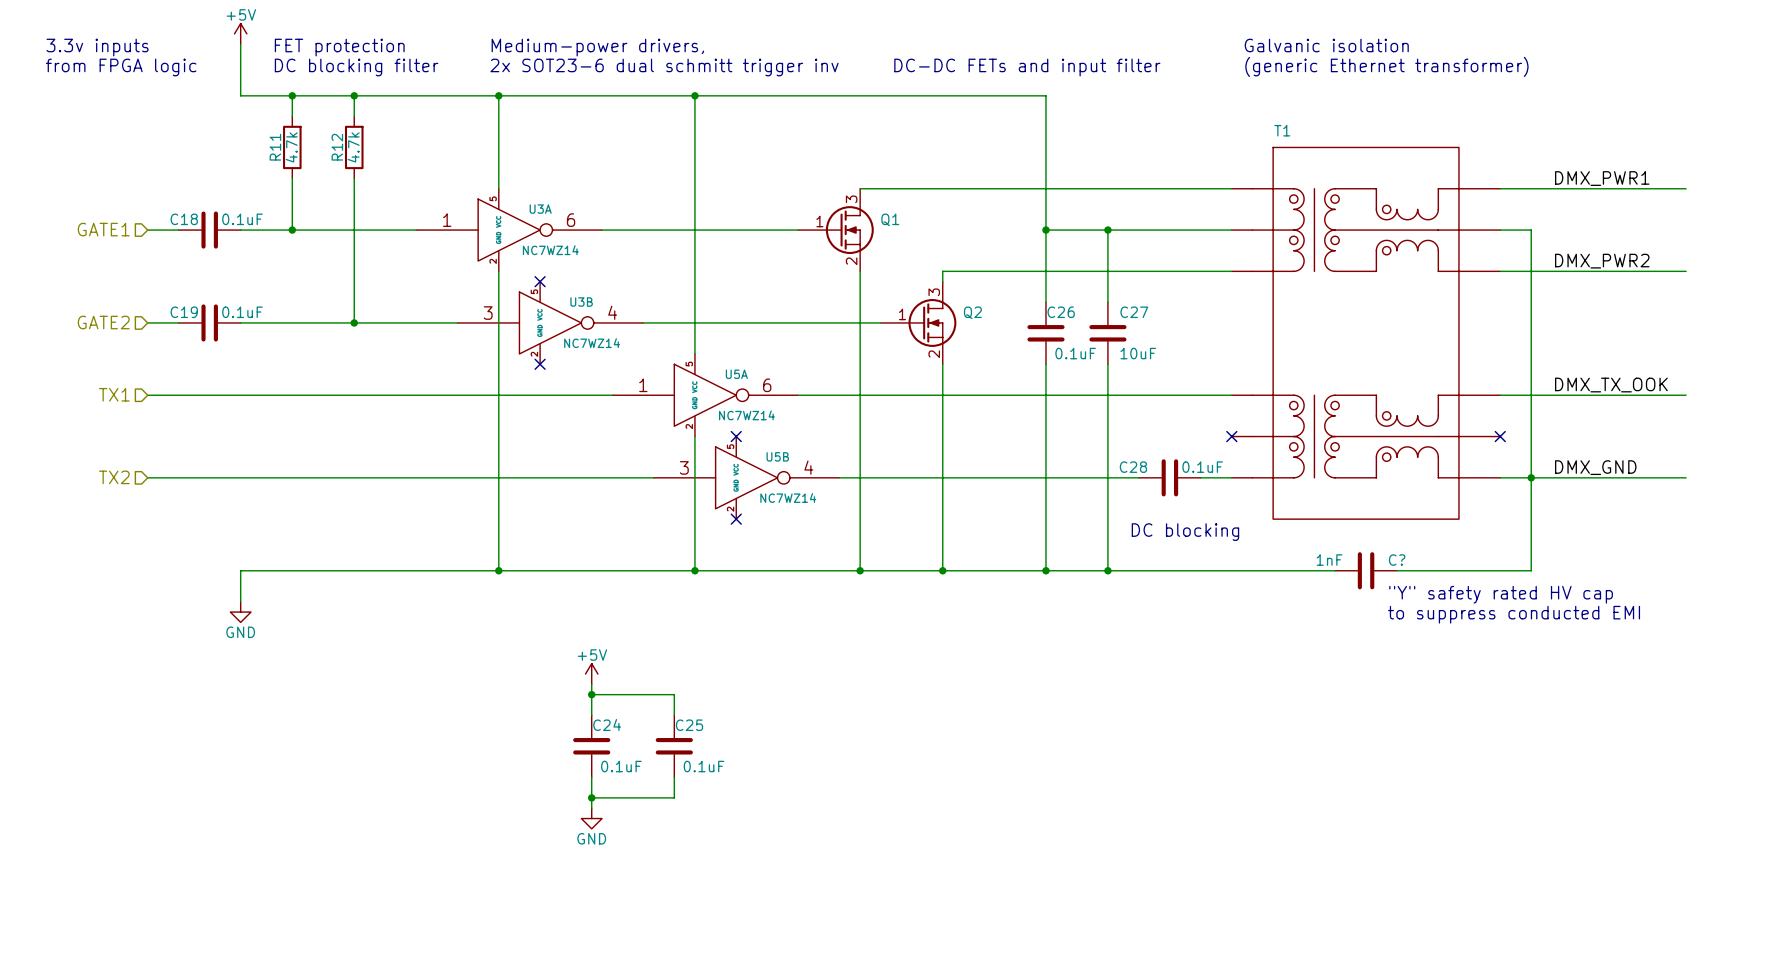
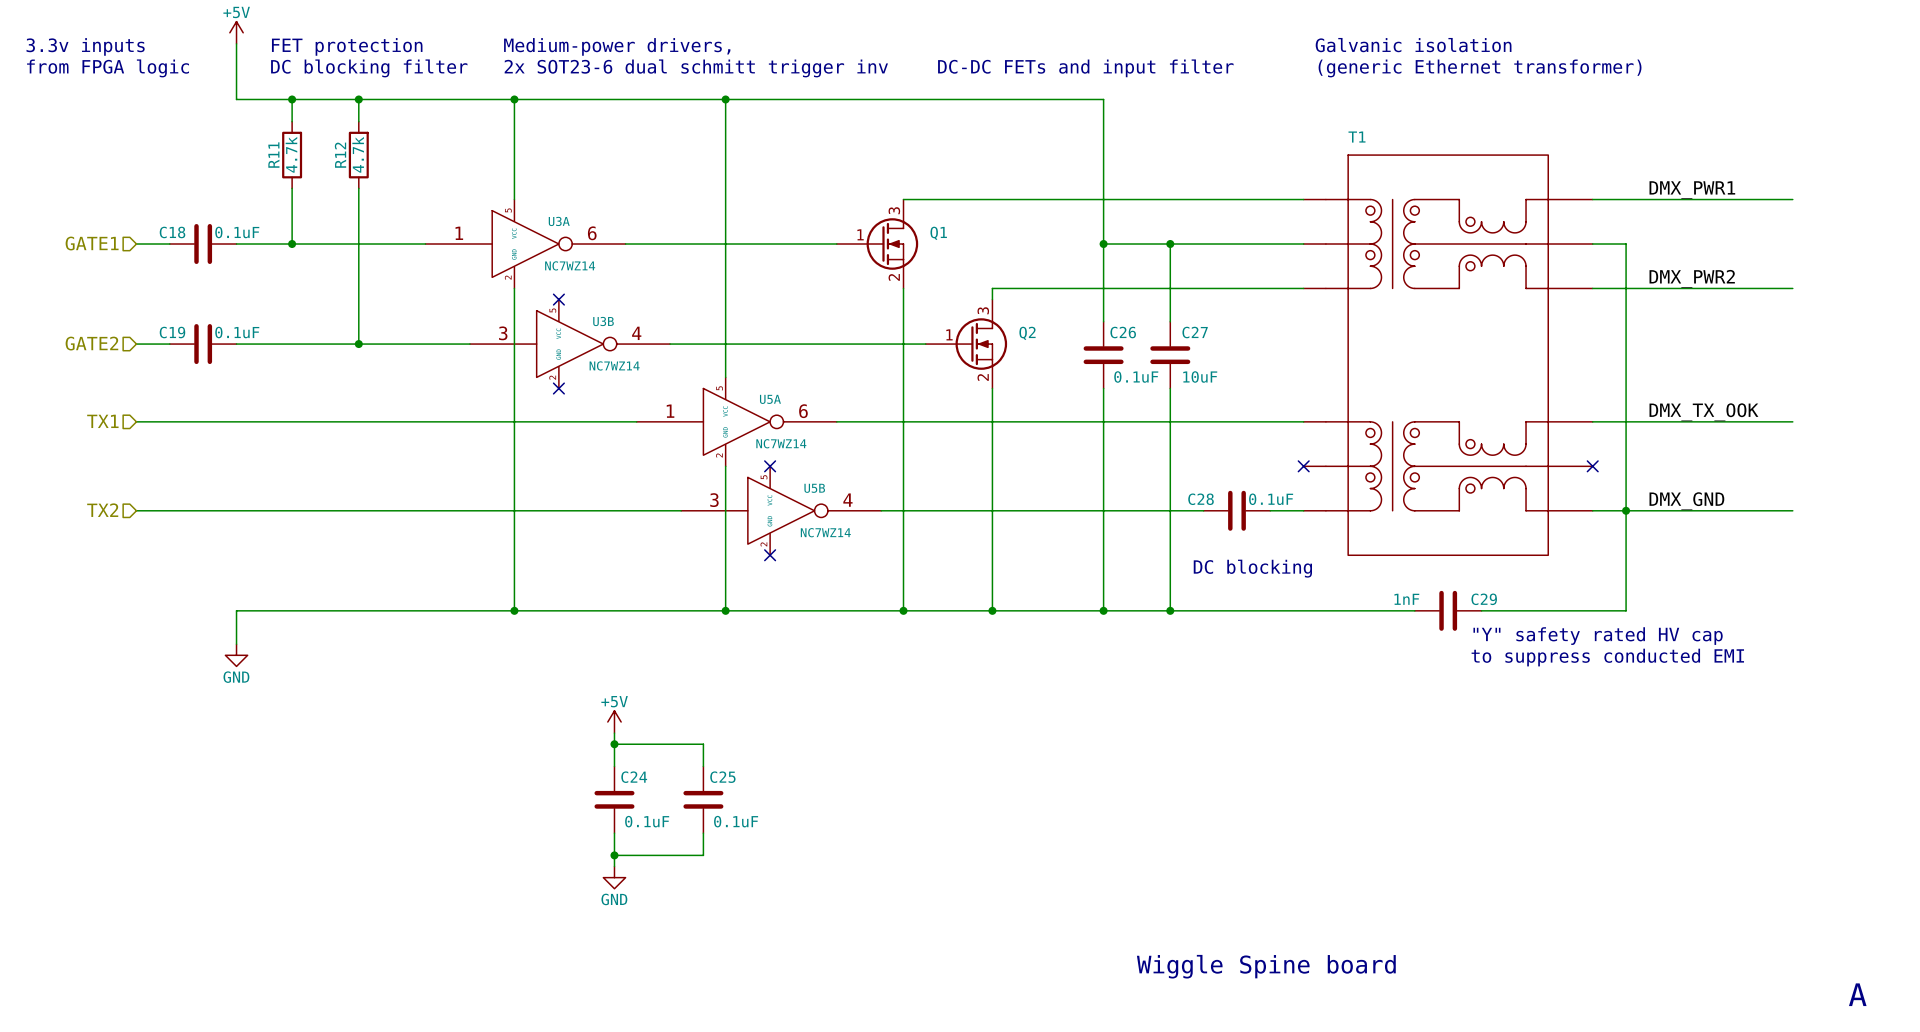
C? name: C? (1397, 560) -> C29 (1484, 599)
text: none -> Wiggle Spine board (1266, 966)
text: none -> A (1857, 994)

